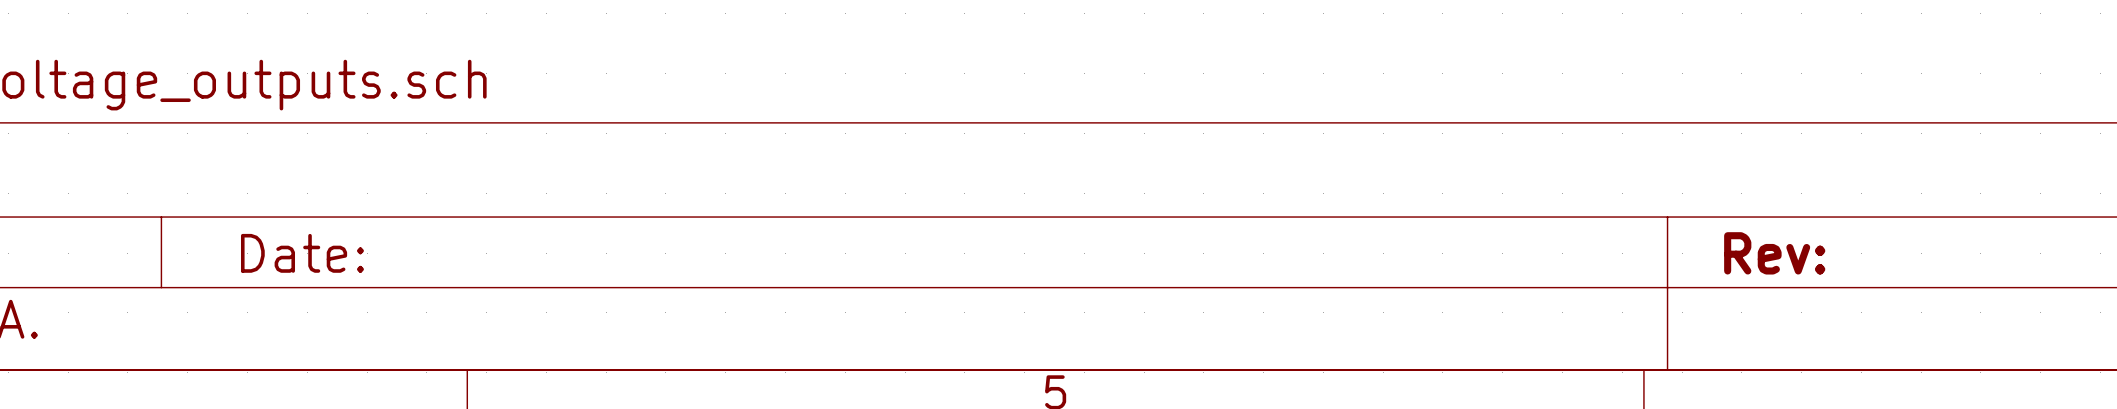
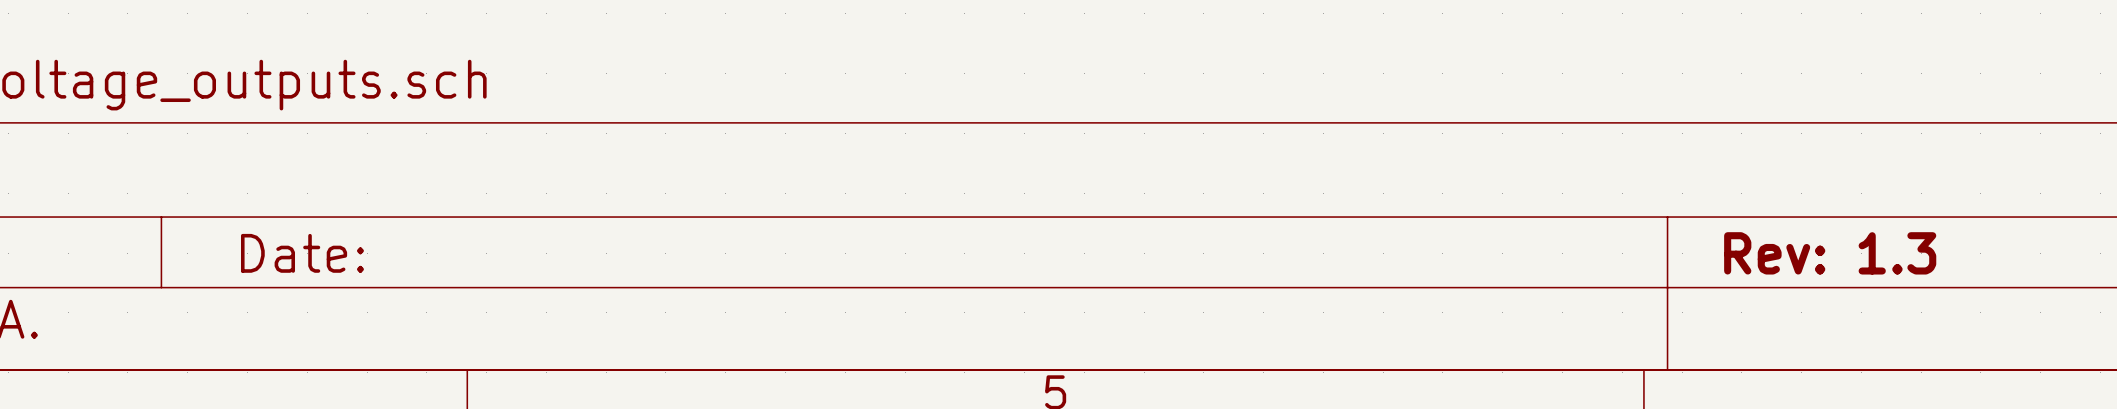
title block: Rev: (1774, 253) -> Rev: 1.3 (1830, 253)

